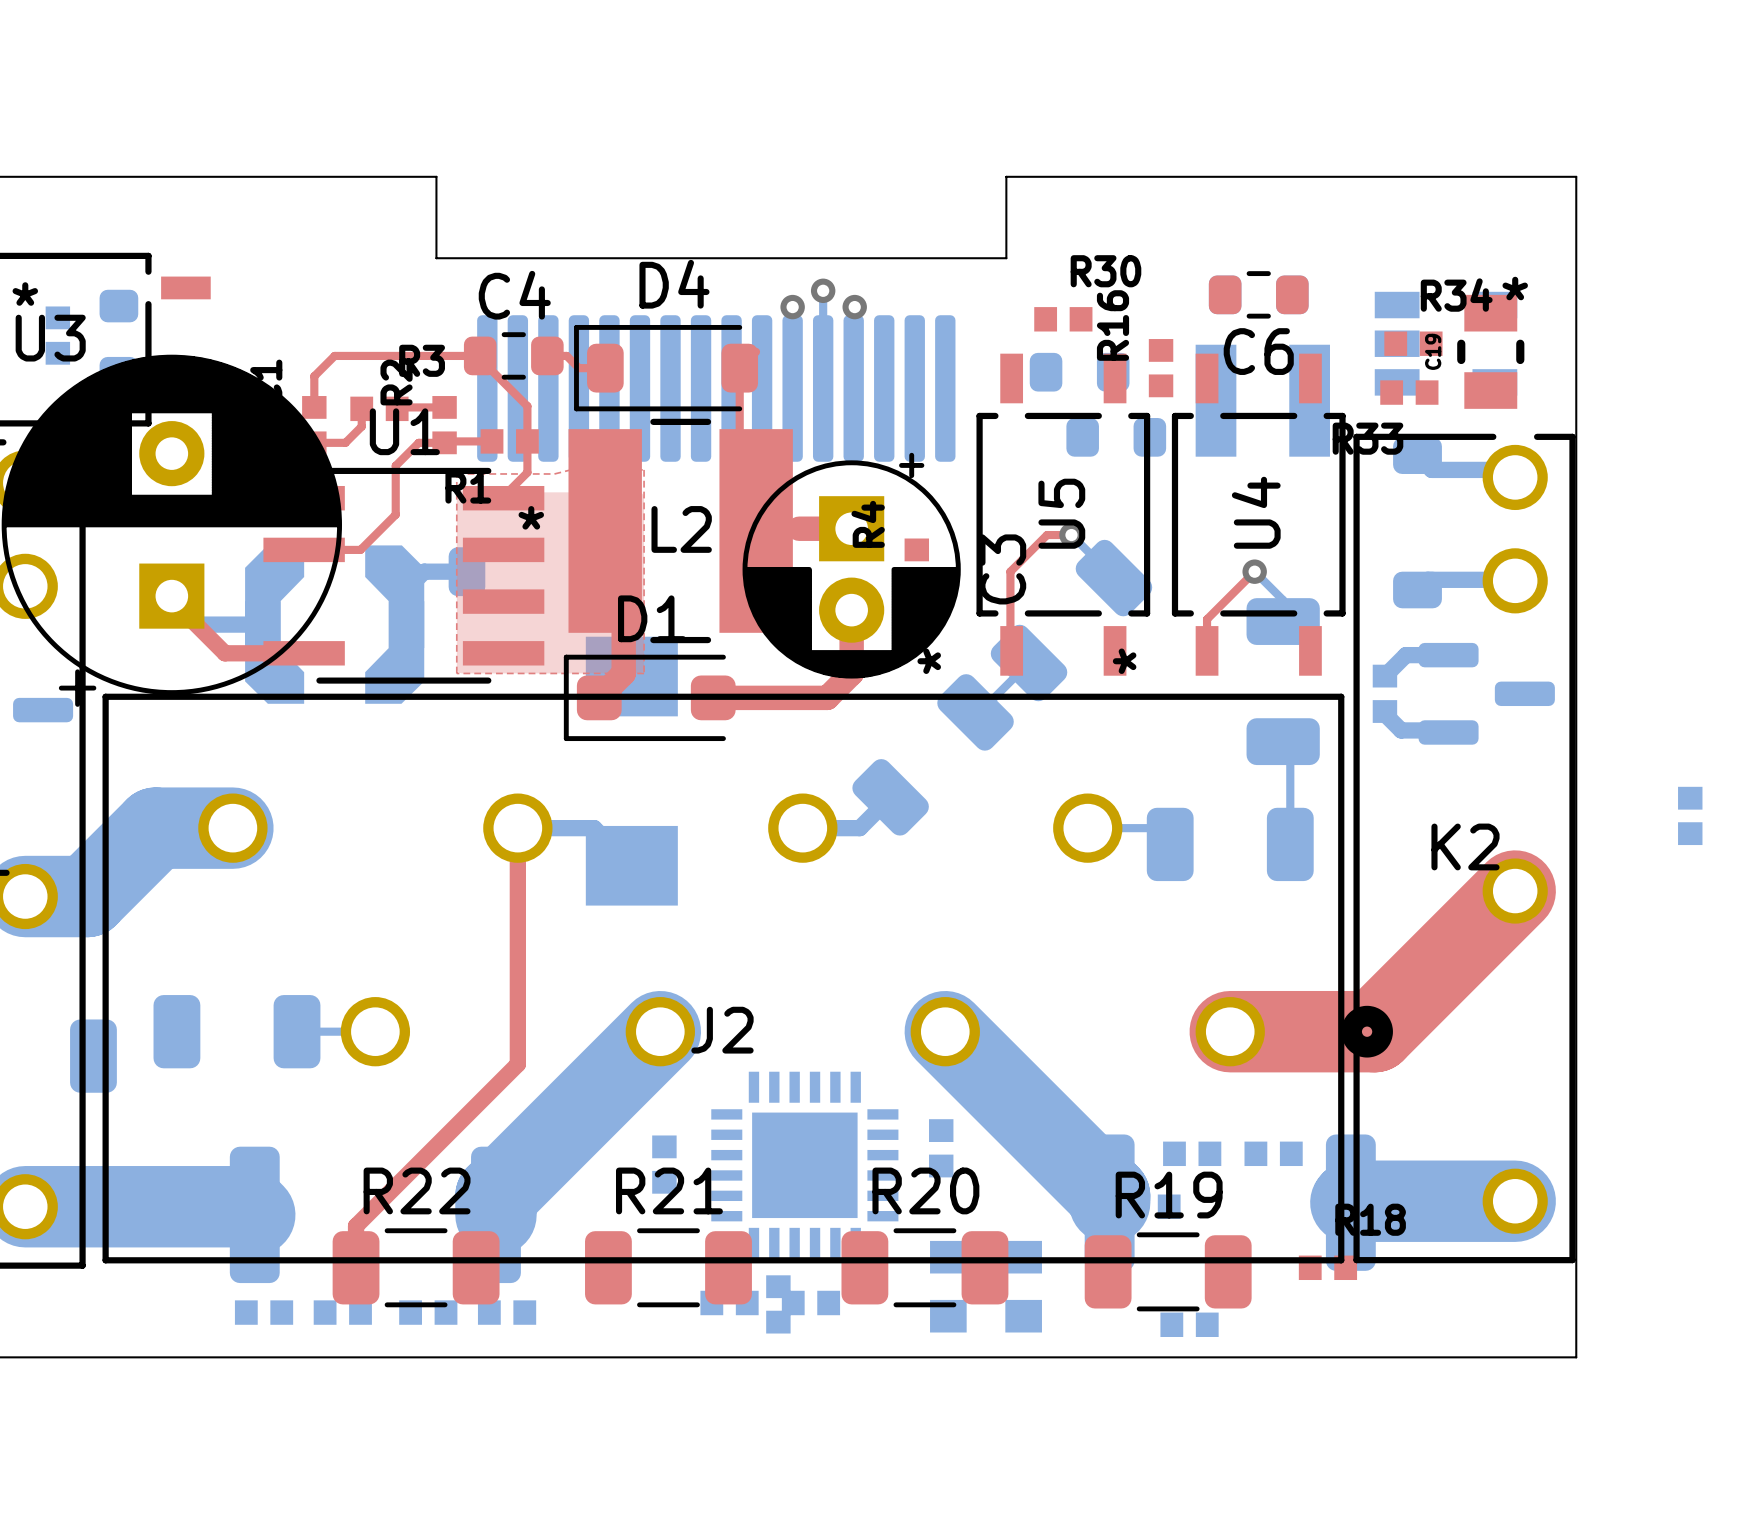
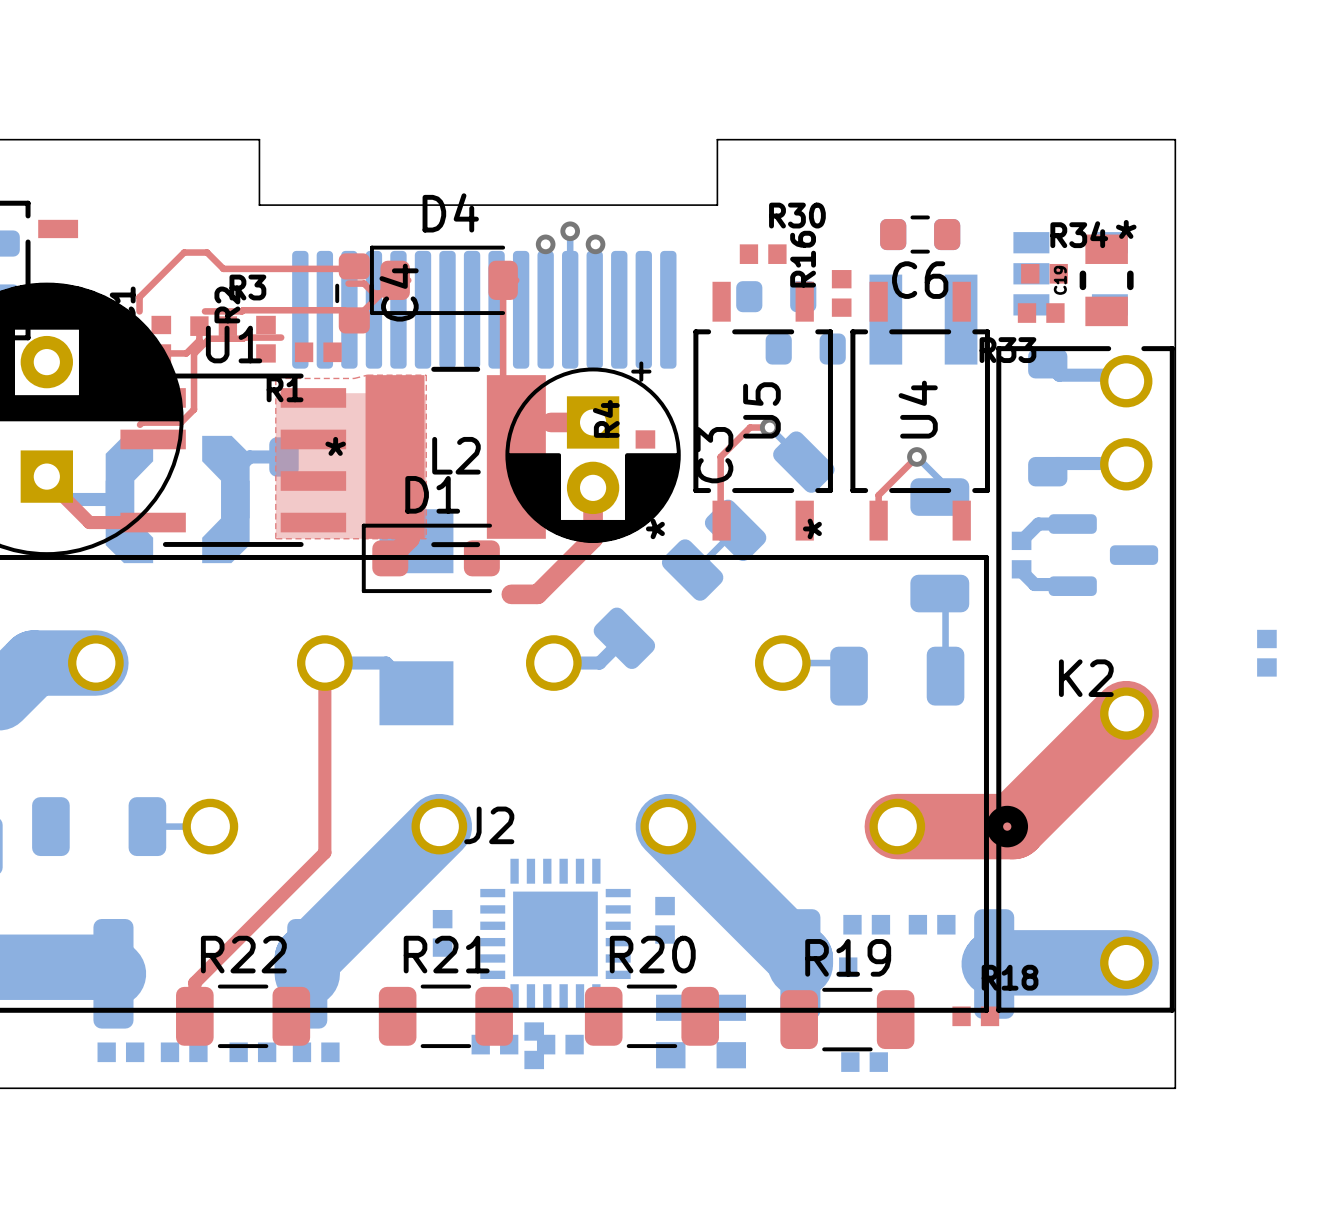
top track: none -> (354, 266) (351, 268) (223, 268) (207, 252) (184, 252) (139, 297) (139, 311)
top track: none -> (408, 280) (394, 280) (354, 320) (344, 310) (204, 311)
C4 rotation: 0° (513, 355) -> 90° clockwise (354, 293)
D4 position: (666, 368) -> (443, 280)
top track: (314, 407) (314, 376) (334, 355) (480, 355) (480, 358) (527, 406) (527, 472) (503, 496) -> none
top track: (444, 407) (397, 408) -> none
top track: none -> (281, 337) (209, 338) (194, 353) (194, 409) (180, 422) (142, 422) (140, 424)
top track: (492, 441) (418, 442) (395, 465) (395, 514) (360, 549) (304, 549) -> none
L2 position: (680, 530) -> (455, 456)
top track: (713, 697) (827, 697) -> (511, 594) (537, 594) (573, 558)

